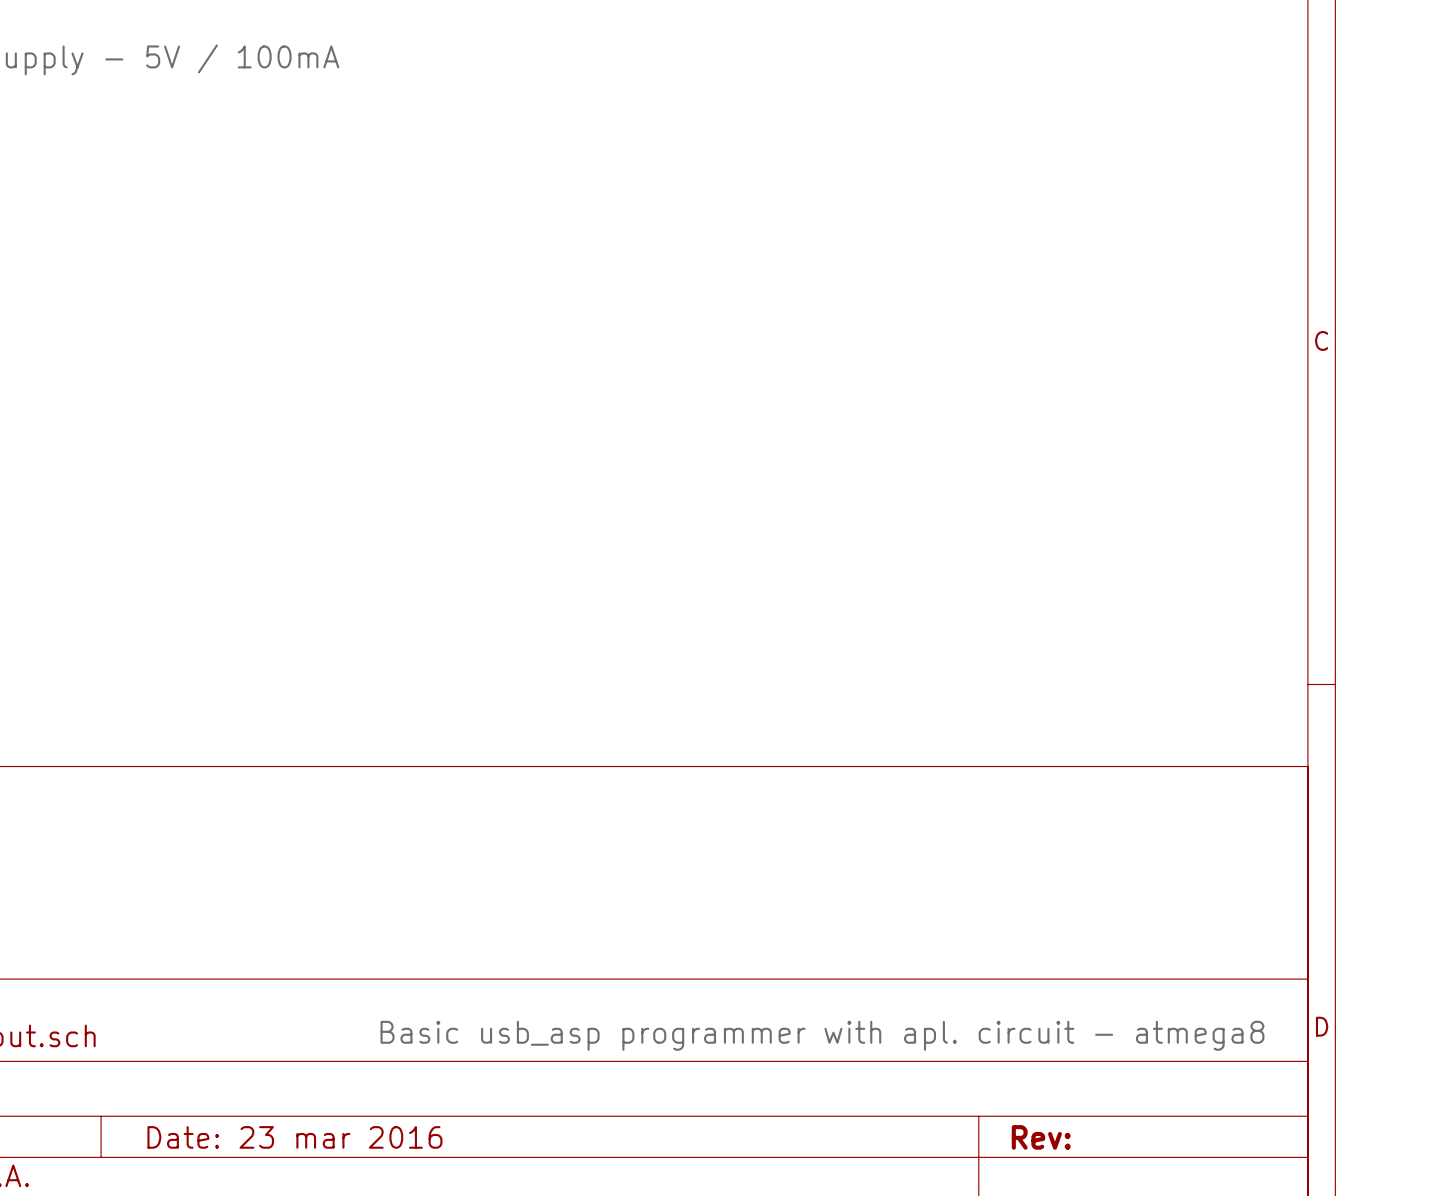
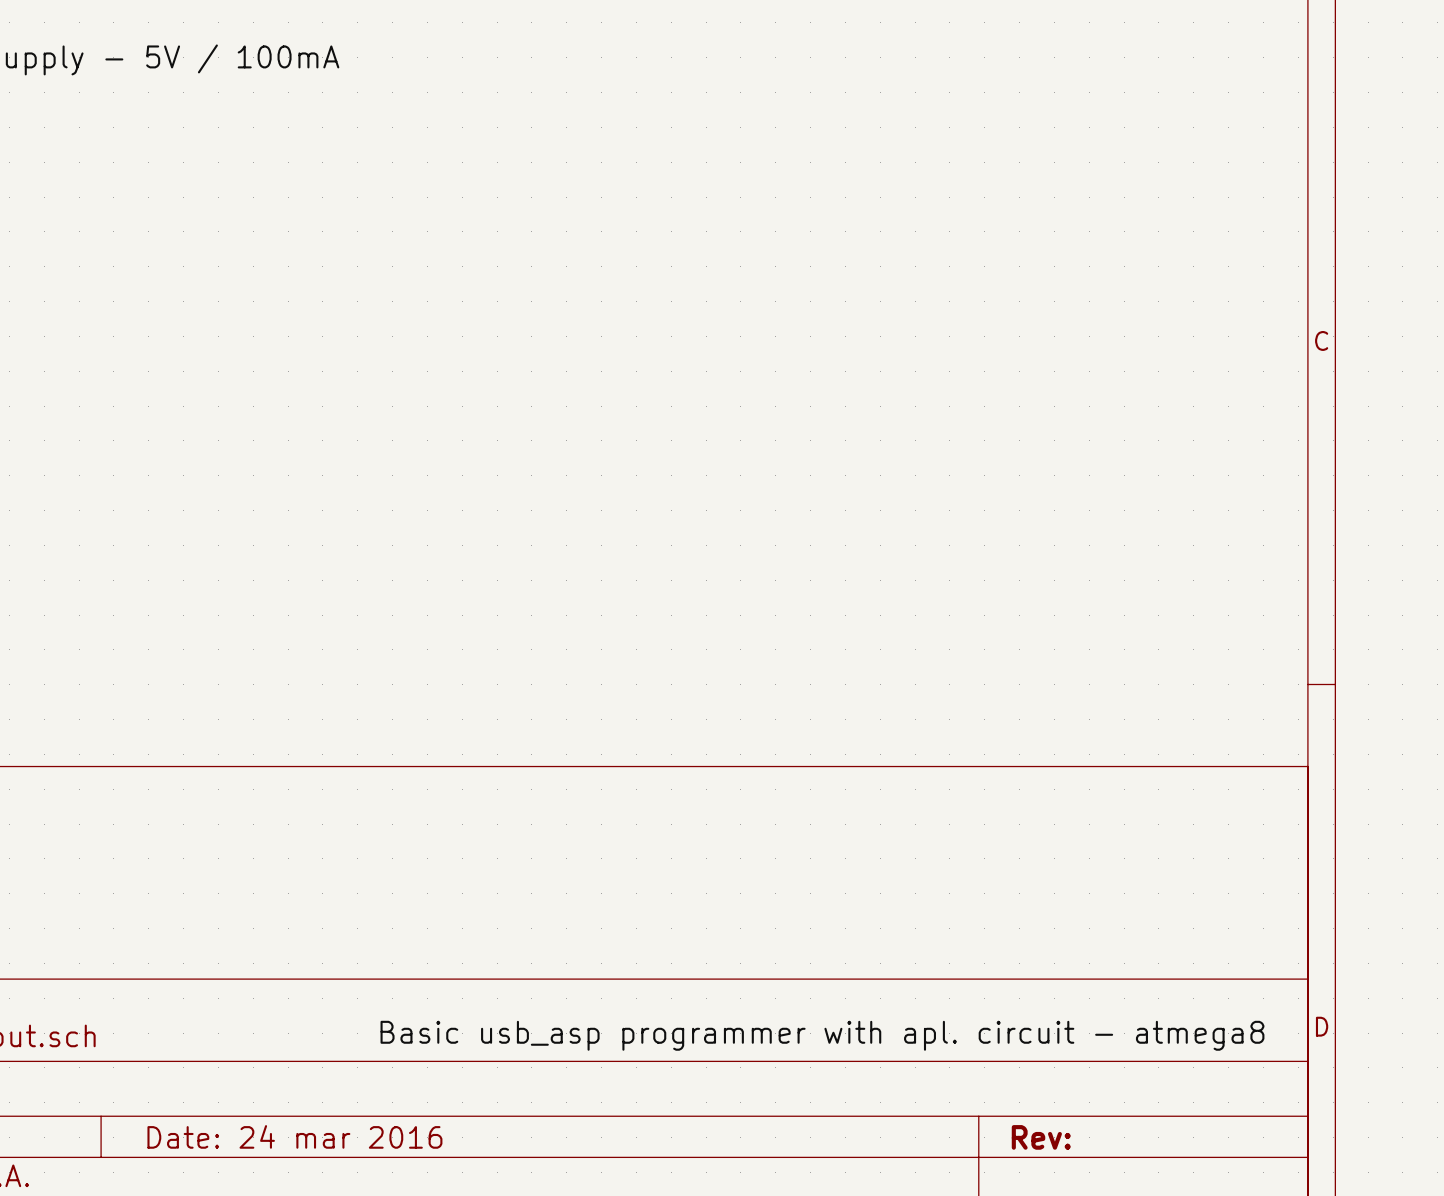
title block: Date: 23 mar 2016 (294, 1137) -> Date: 24 mar 2016 (294, 1136)

